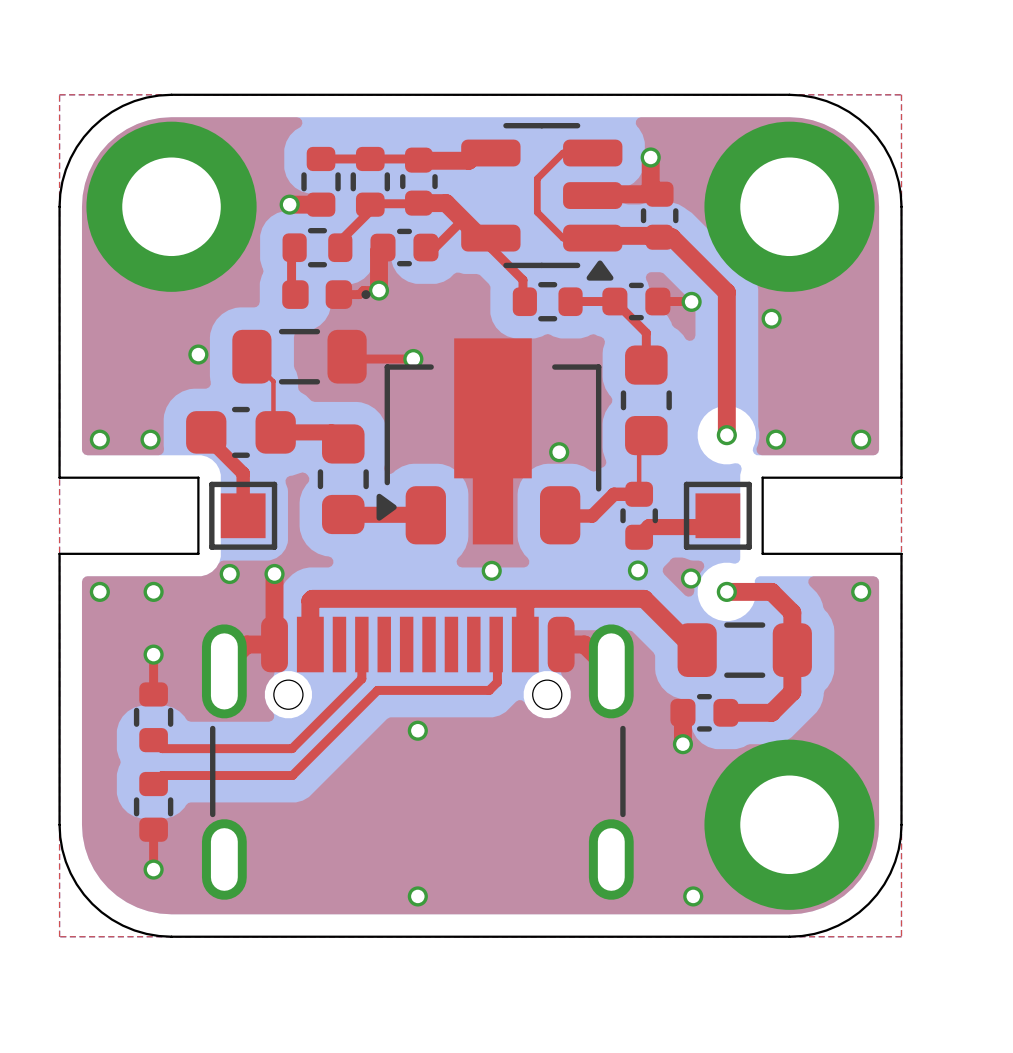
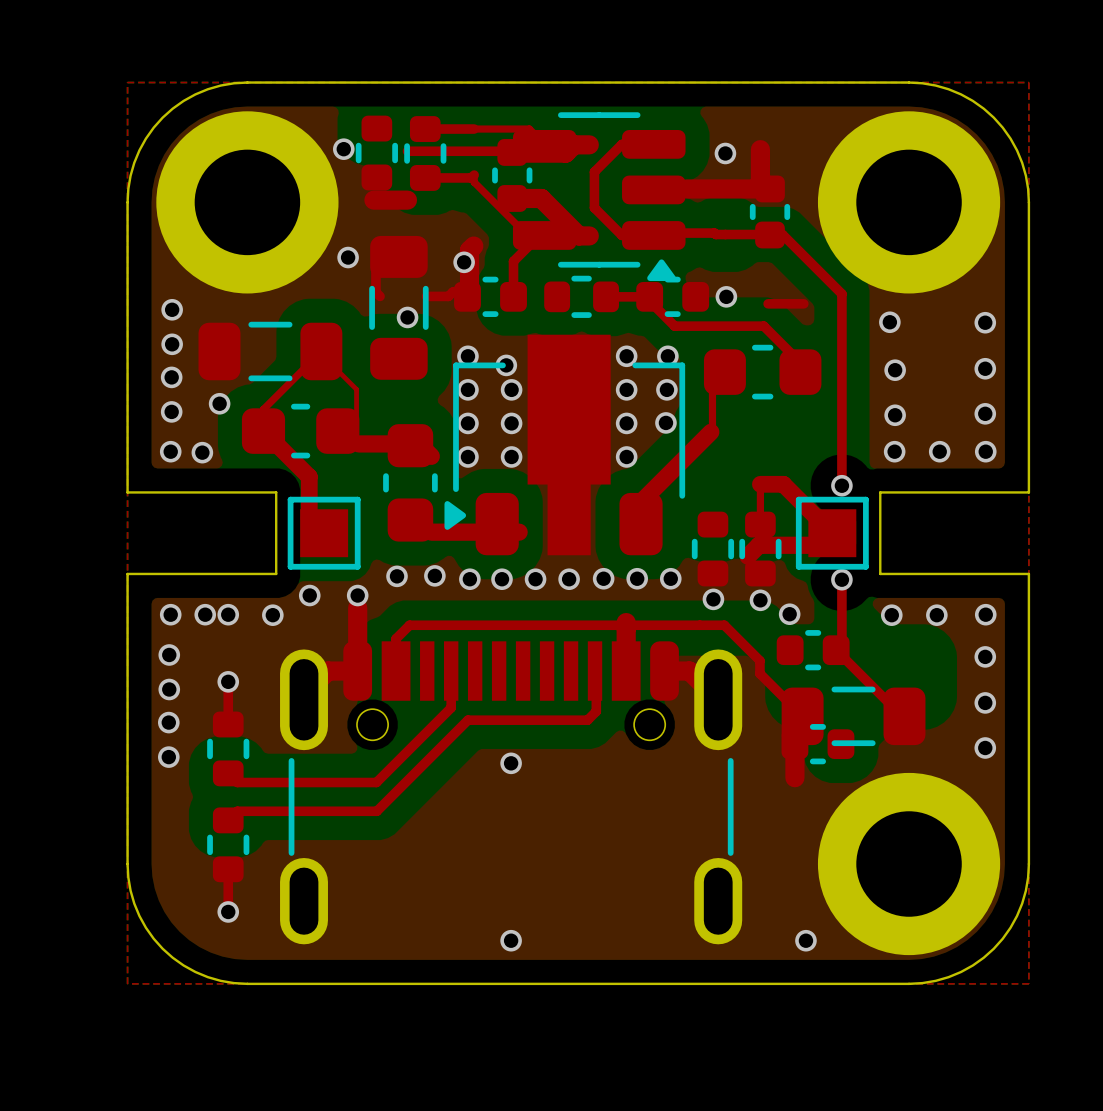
top track: none -> (425, 129) (529, 129) (544, 144)
top track: (592, 153) (563, 153) (537, 178) (537, 212) (563, 238) (592, 238) (594, 235) (671, 237) -> (653, 144) (622, 144) (594, 171) (594, 207) (622, 235) (653, 235) (656, 233) (782, 234)
via: none -> (343, 149)
via position: (650, 157) -> (725, 153)
part: none -> (376, 153)
part: none -> (425, 153)
part: (321, 181) -> none
part: (370, 181) -> none
top track: none -> (425, 177) (471, 177) (474, 175) (474, 182) (527, 235) (544, 235) (529, 235)
part position: (541, 201) -> (599, 196)
top track: (419, 203) (371, 203) (370, 210) (337, 244) -> none
via: (289, 204) -> none
top track: (462, 224) (462, 219) (434, 248) (425, 247) -> none
top track: none -> (539, 235) (513, 261) (513, 296) (520, 290)
top track width: thick (671, 237) (726, 292) (726, 435) -> thin (782, 234) (841, 293) (841, 446)
top track: (476, 238) (490, 238) (490, 247) (522, 280) (522, 301) -> none
part: (317, 247) -> none
part position: (404, 247) -> (490, 296)
via: none -> (348, 257)
part footprint: [282, 280, 371, 309] -> [369, 235, 429, 380]
part footprint: [512, 282, 583, 322] -> [636, 276, 710, 317]
via position: (379, 290) -> (464, 262)
part: none -> (581, 296)
top track: none -> (606, 296) (649, 296) (649, 301) (674, 326) (763, 326) (801, 363) (800, 367)
via: none -> (726, 296)
top track: (570, 301) (614, 301) (646, 332) (646, 365) -> none
part: (636, 301) -> none
via: (691, 301) -> none
via: none -> (172, 309)
via: none -> (407, 317)
via: none -> (985, 322)
via: none -> (172, 344)
via: none -> (467, 356)
via: none -> (626, 356)
via: none -> (667, 356)
via: (198, 354) -> none
part position: (299, 356) -> (270, 351)
top track: (347, 356) (349, 359) (413, 359) -> none
via: none -> (985, 368)
via: none -> (895, 370)
top track: none -> (724, 372) (712, 384) (712, 430) (641, 502) (641, 524)
via: none -> (171, 377)
via: none -> (467, 389)
via: none -> (511, 389)
via: none -> (626, 389)
via: none -> (666, 389)
via: none -> (219, 403)
part rotation: 0° (646, 400) -> 90° clockwise (762, 372)
via: none -> (171, 411)
via: none -> (985, 413)
via: none -> (895, 415)
via: none -> (665, 422)
via: none -> (467, 423)
via: none -> (511, 423)
via: none -> (626, 423)
part footprint: [317, 424, 369, 535] -> [383, 424, 438, 542]
top track: (206, 432) (206, 436) (243, 473) (243, 515) -> (321, 351) (263, 409) (263, 431) (309, 476) (309, 518) (324, 533)
part position: (240, 432) -> (300, 431)
top track: (646, 435) (639, 442) (639, 494) (613, 494) (592, 515) (560, 515) -> none
top track: none -> (841, 446) (841, 485)
via: (726, 435) -> none
via position: (150, 439) -> (202, 452)
via: none -> (939, 451)
part position: (488, 441) -> (564, 444)
via: none -> (467, 456)
via: none -> (511, 456)
via: none -> (626, 456)
via: (559, 452) -> none
via: none -> (841, 485)
top track: none -> (760, 519) (760, 484) (783, 484) (832, 533)
part rotation: 0° (639, 515) -> 90° clockwise (813, 650)
part position: (639, 515) -> (813, 650)
part: none -> (712, 549)
part: none -> (760, 549)
via: none -> (434, 575)
via: none -> (397, 576)
via: none -> (469, 579)
via: none -> (502, 579)
via: none -> (535, 579)
via: none -> (569, 579)
via: none -> (603, 578)
via: none -> (637, 578)
via: none -> (670, 578)
top track: none -> (841, 579) (841, 644) (836, 650) (902, 716) (904, 716)
via: none -> (841, 579)
via: (491, 570) -> none
via position: (637, 570) -> (760, 600)
via: none -> (713, 599)
via position: (691, 578) -> (789, 614)
via: none -> (205, 614)
top track: (726, 591) (771, 591) (792, 612) (792, 692) (771, 712) (725, 712) -> none
via: (726, 591) -> none
via: none -> (272, 615)
via: none -> (891, 615)
via: none -> (936, 615)
top track: (524, 598) (312, 598) (310, 600) (310, 614) -> (802, 716) (759, 673) (759, 660) (724, 625) (409, 625) (396, 638)
top track: (525, 598) (644, 598) (697, 650) -> none
via: none -> (169, 654)
via: none -> (985, 656)
part position: (744, 650) -> (853, 716)
via: none -> (169, 689)
via: none -> (985, 702)
via: none -> (168, 722)
via: none -> (985, 747)
via: none -> (168, 757)
via: (682, 744) -> none

